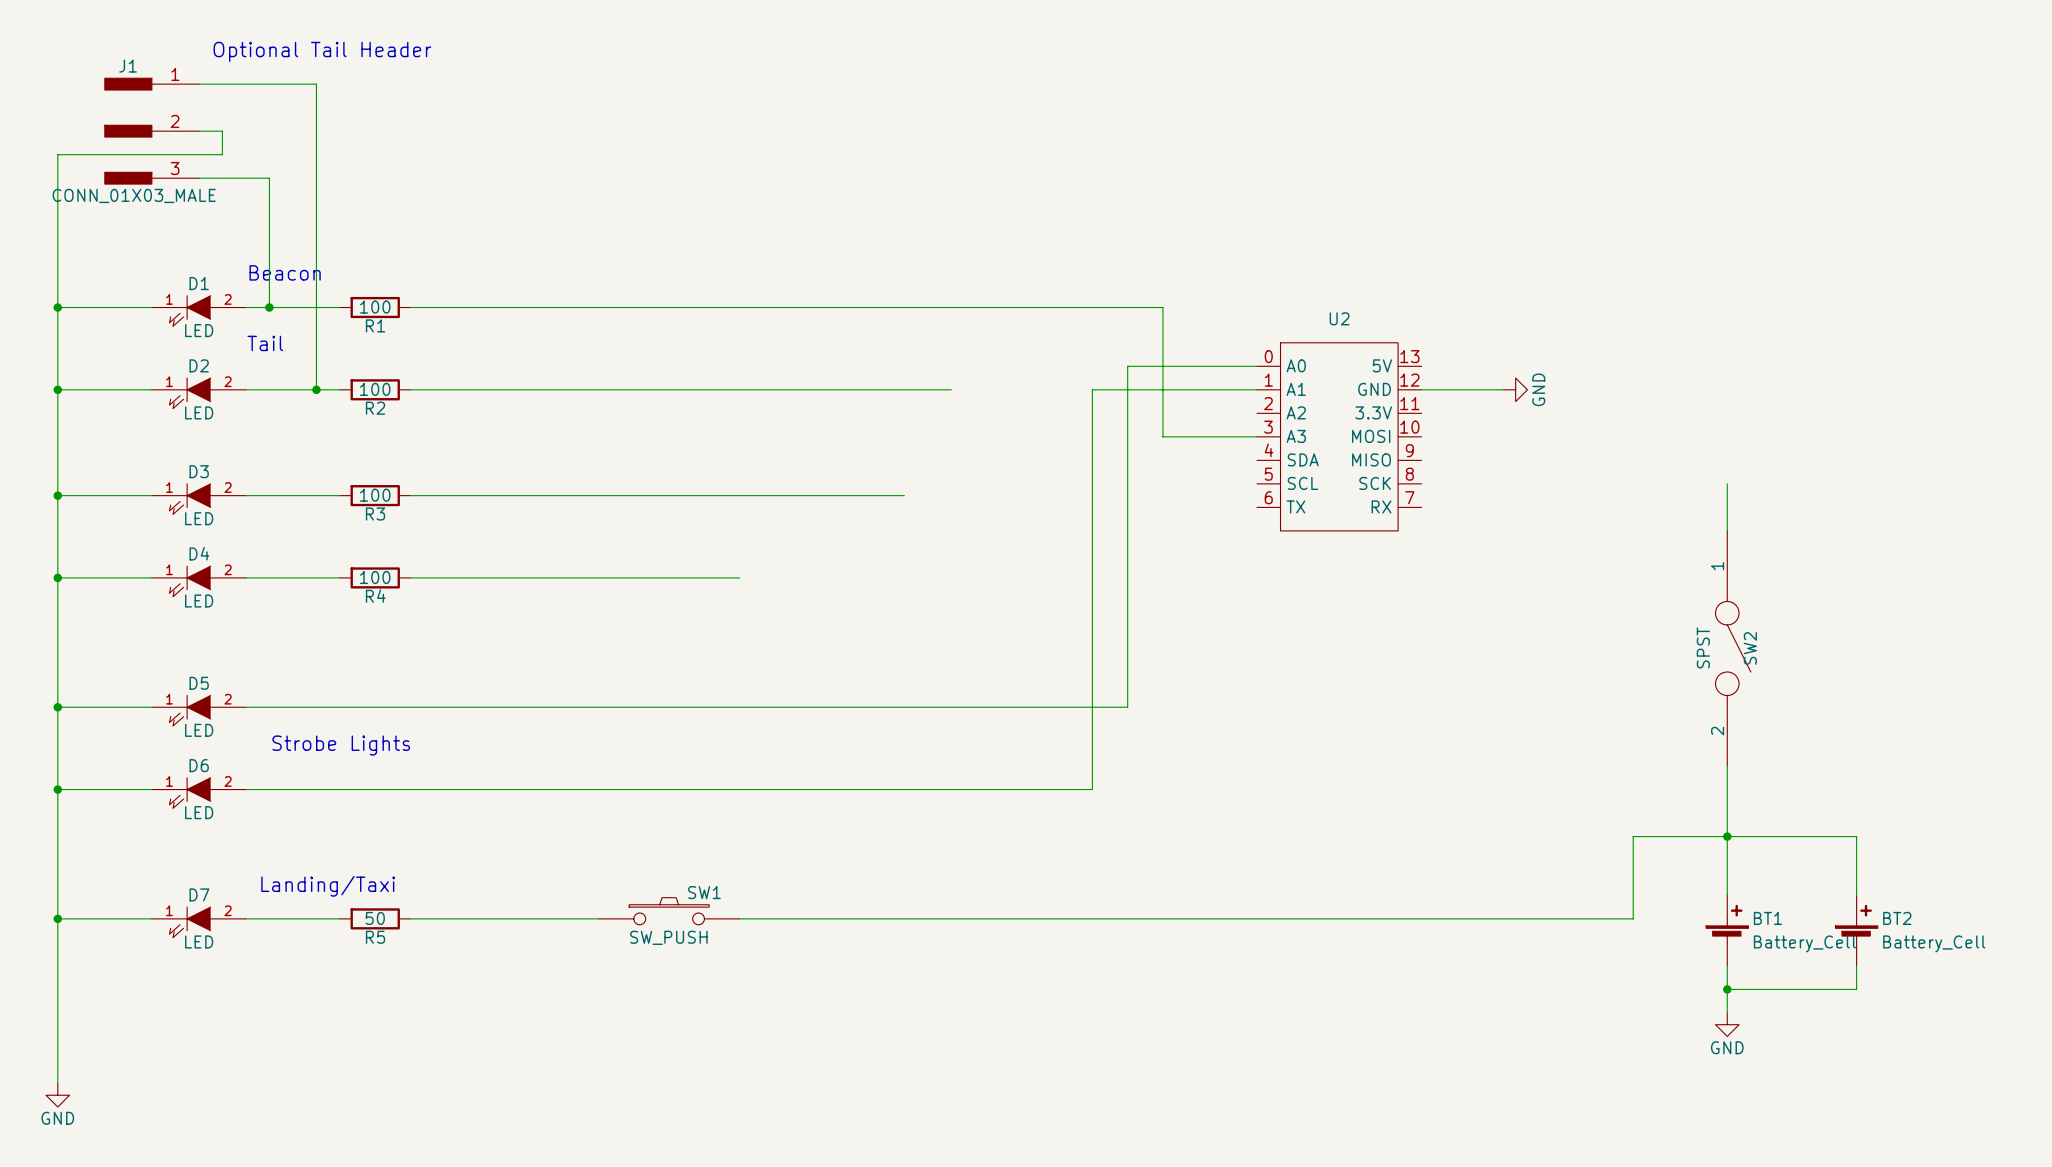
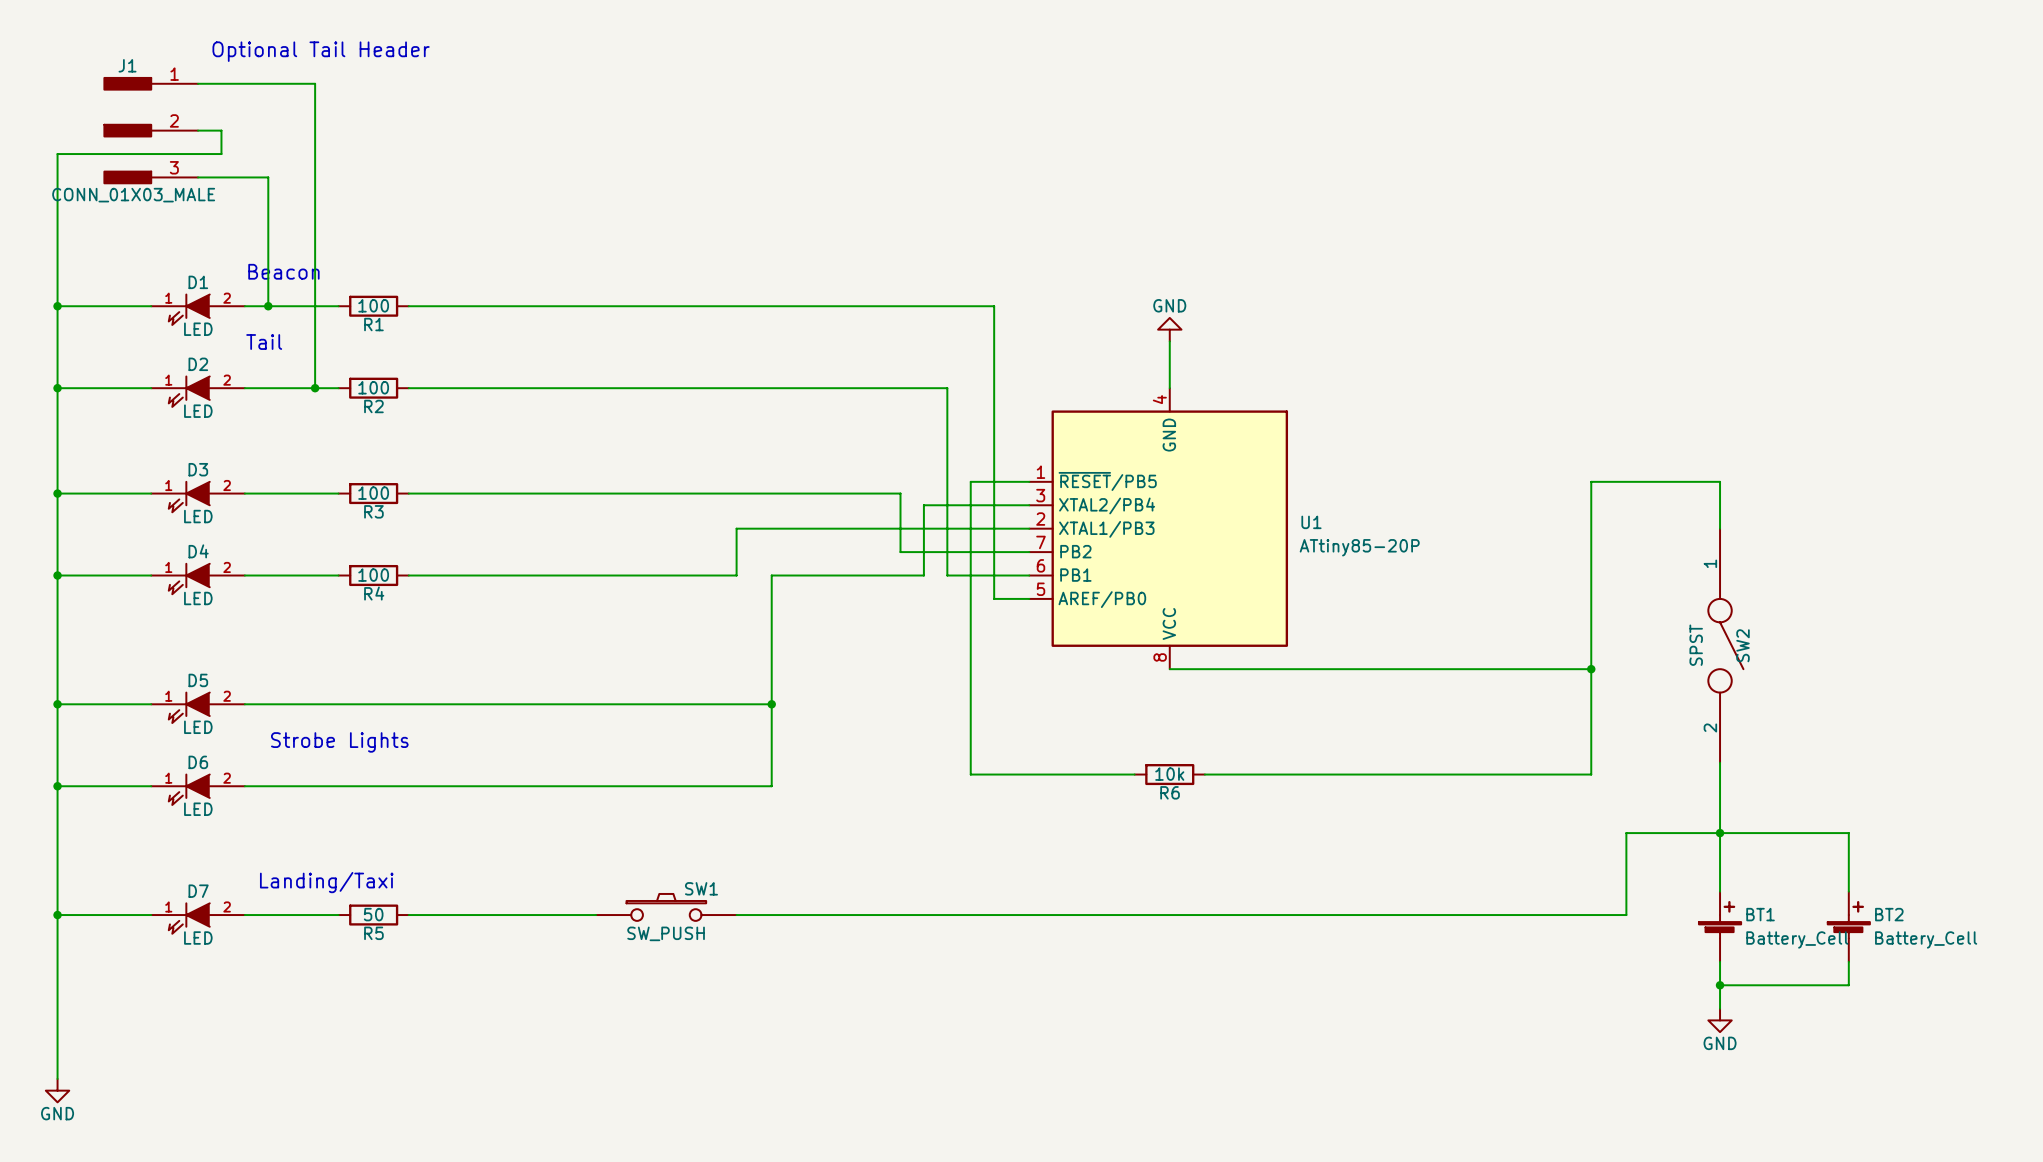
wire: (998, 307) (1162, 307) (1162, 436) (1257, 436) -> (994, 306) (994, 598) (1029, 598)
power symbol: none -> GND (1169, 329)
wire: none -> (1169, 341) (1169, 388)
wire: (1257, 366) (1127, 366) (1127, 707) (774, 707) -> none
wire: none -> (947, 388) (947, 575) (1029, 575)
wire: (1257, 389) (1092, 389) (1092, 789) (774, 789) -> (1029, 505) (923, 505) (923, 575) (771, 575) (771, 786)
wire: (1421, 389) (1503, 389) -> none
power symbol: GND (1515, 389) -> none
U2: (1339, 436) -> none
wire: none -> (1029, 481) (970, 481) (970, 774) (1134, 774)
wire: none -> (1720, 481) (1591, 481) (1591, 774) (1204, 774)
wire: none -> (900, 493) (900, 552) (1029, 552)
wire: none -> (1029, 528) (736, 528) (736, 575)
U1: none -> ATtiny85-20P (1158, 528)
wire: none -> (1169, 669) (1591, 669)
junction: none -> (1591, 669)
junction: none -> (771, 704)
R6: none -> 10k (1169, 774)

